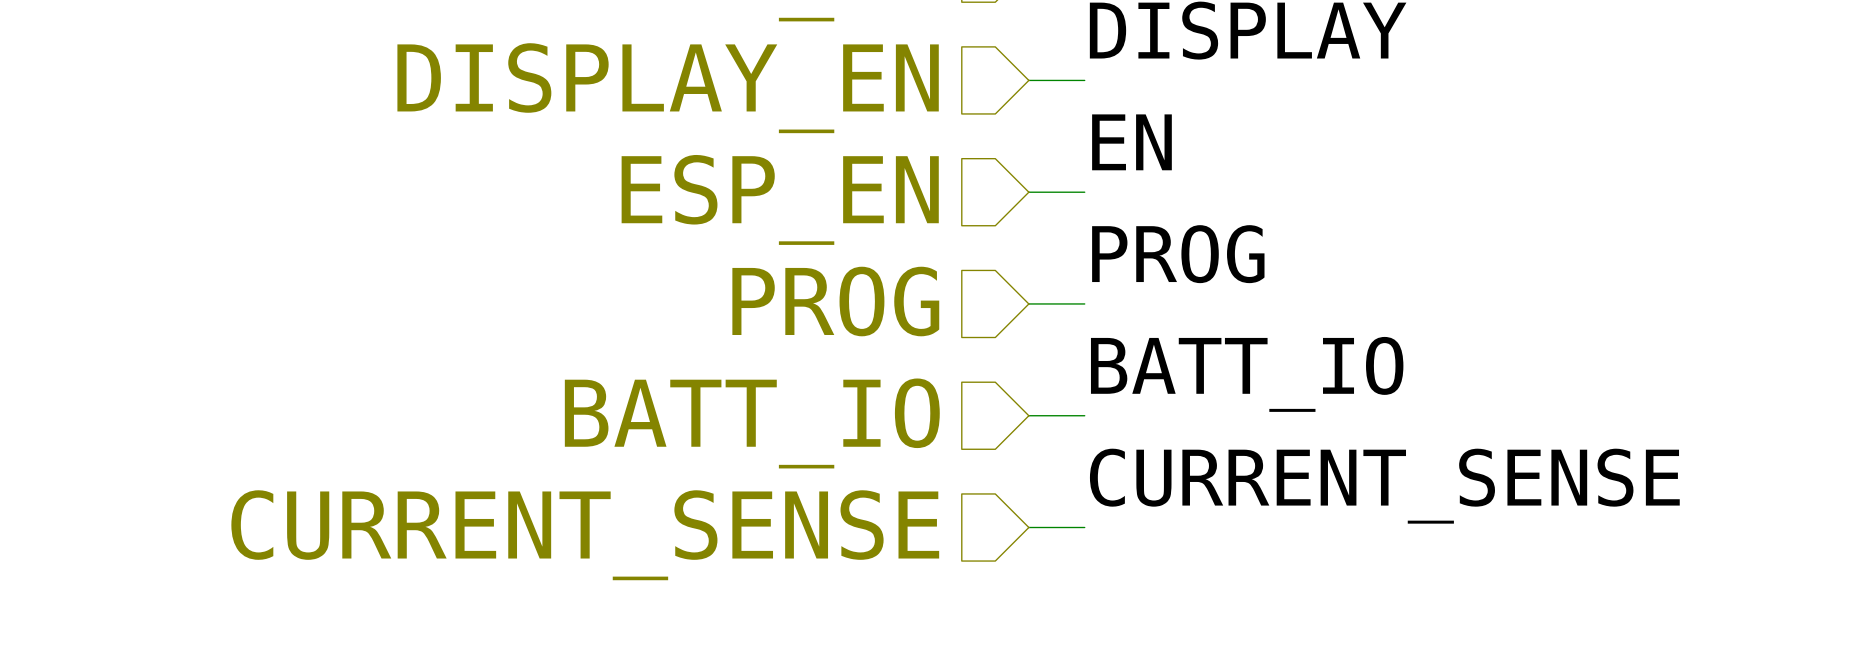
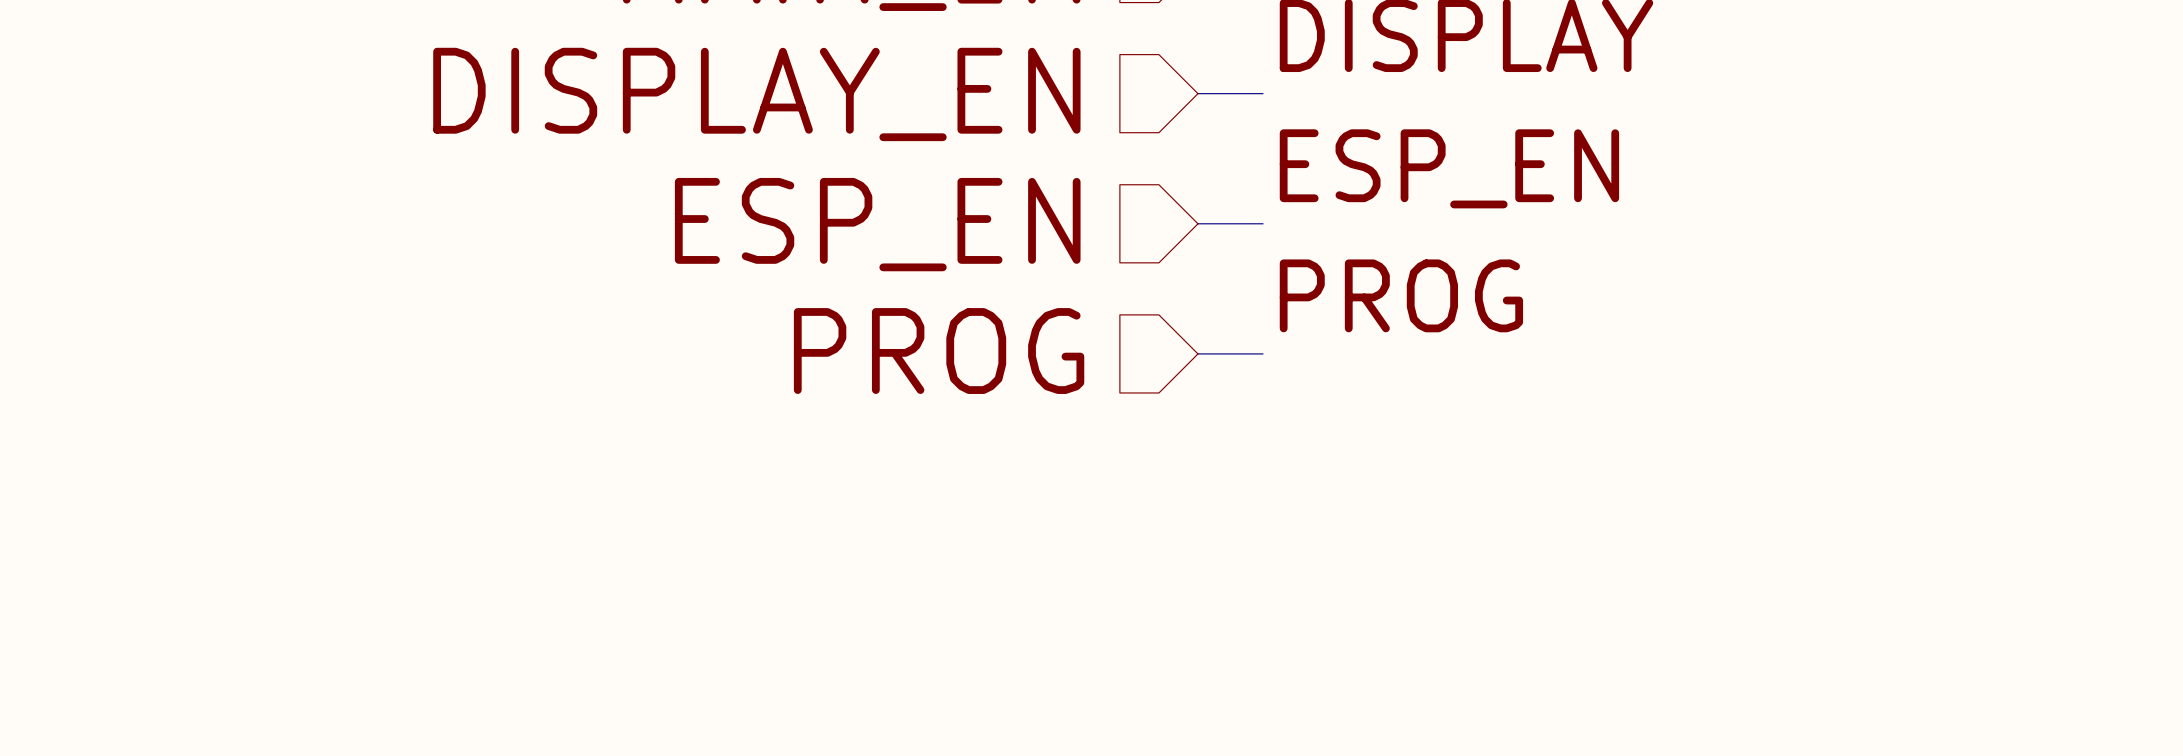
label: EN (1131, 142) -> ESP_EN (1449, 168)
label: BATT_IO (1247, 374) -> none
wire: (1028, 415) (1084, 415) -> none
hierarchical label: BATT_IO (752, 423) -> none
label: CURRENT_SENSE (1384, 486) -> none
wire: (1028, 527) (1084, 527) -> none
hierarchical label: CURRENT_SENSE (585, 535) -> none

